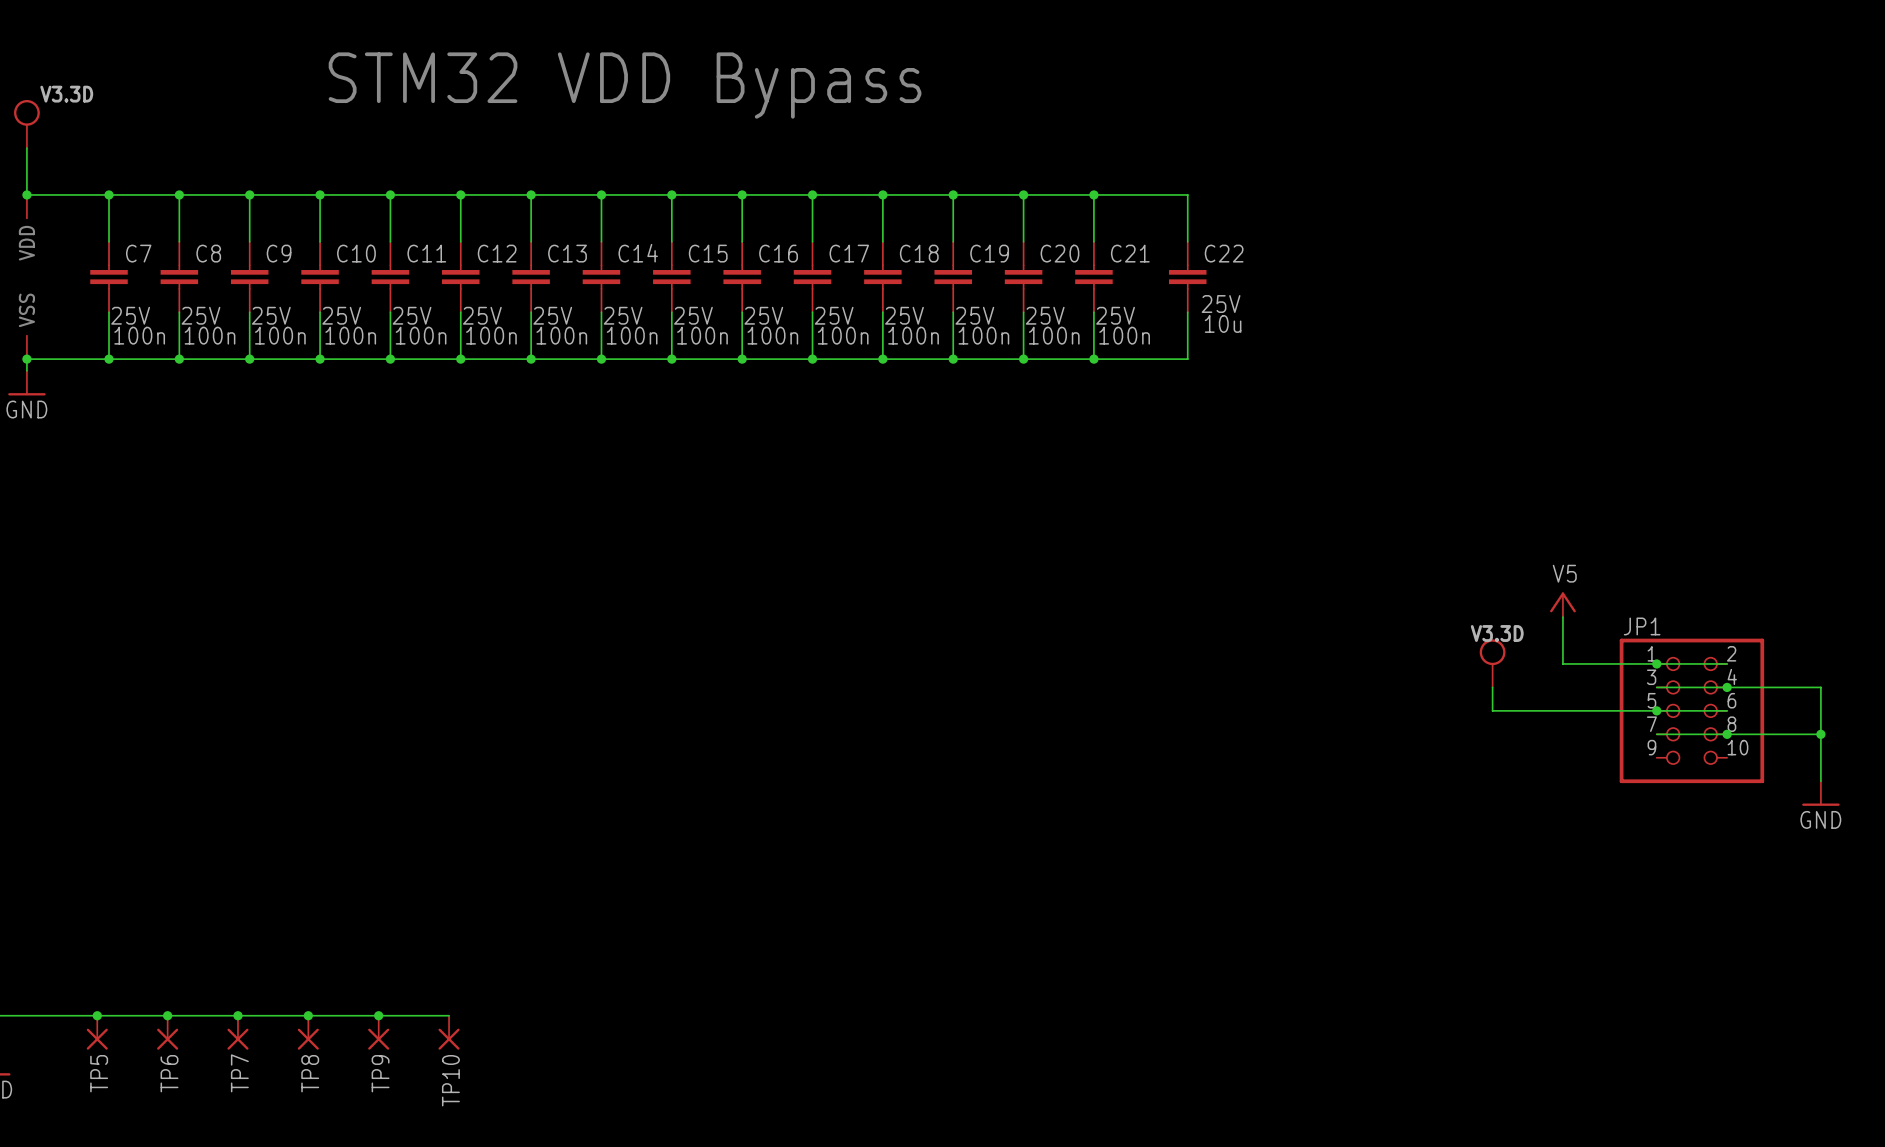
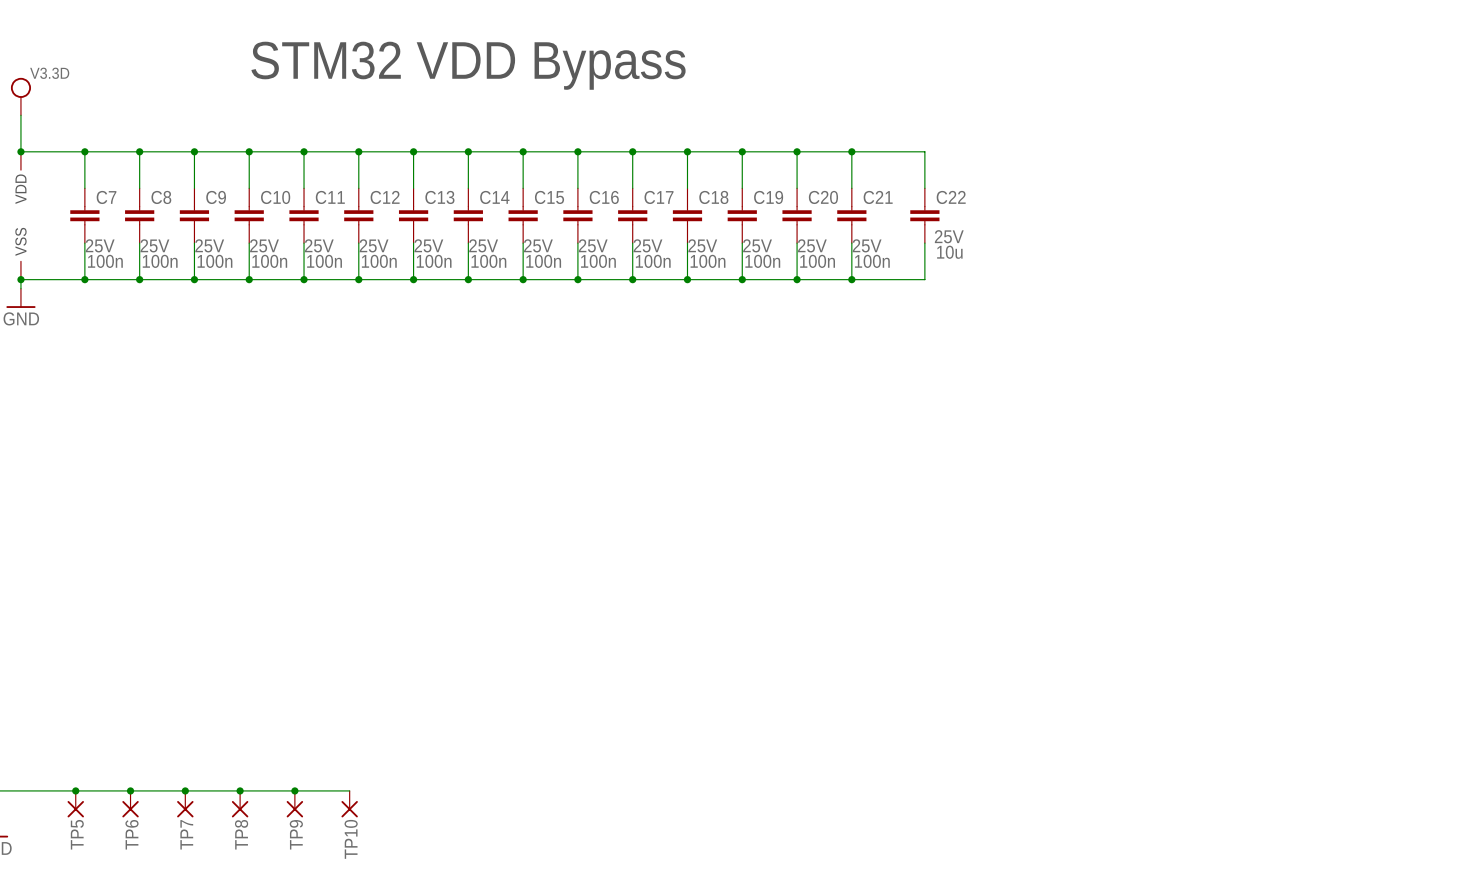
power symbol: V5 (1562, 604) -> none
wire: (1562, 617) (1562, 663) (1727, 663) -> none
power symbol: V3.3D (1492, 663) -> none
junction: (1656, 663) -> none
wire: (1492, 687) (1492, 710) (1727, 710) -> none
wire: (1656, 687) (1820, 687) (1820, 781) -> none
junction: (1727, 687) -> none
junction: (1656, 710) -> none
JP1: (1691, 710) -> none
wire: (1656, 734) (1820, 734) -> none
junction: (1727, 734) -> none
junction: (1820, 734) -> none
power symbol: GND (1820, 793) -> none

